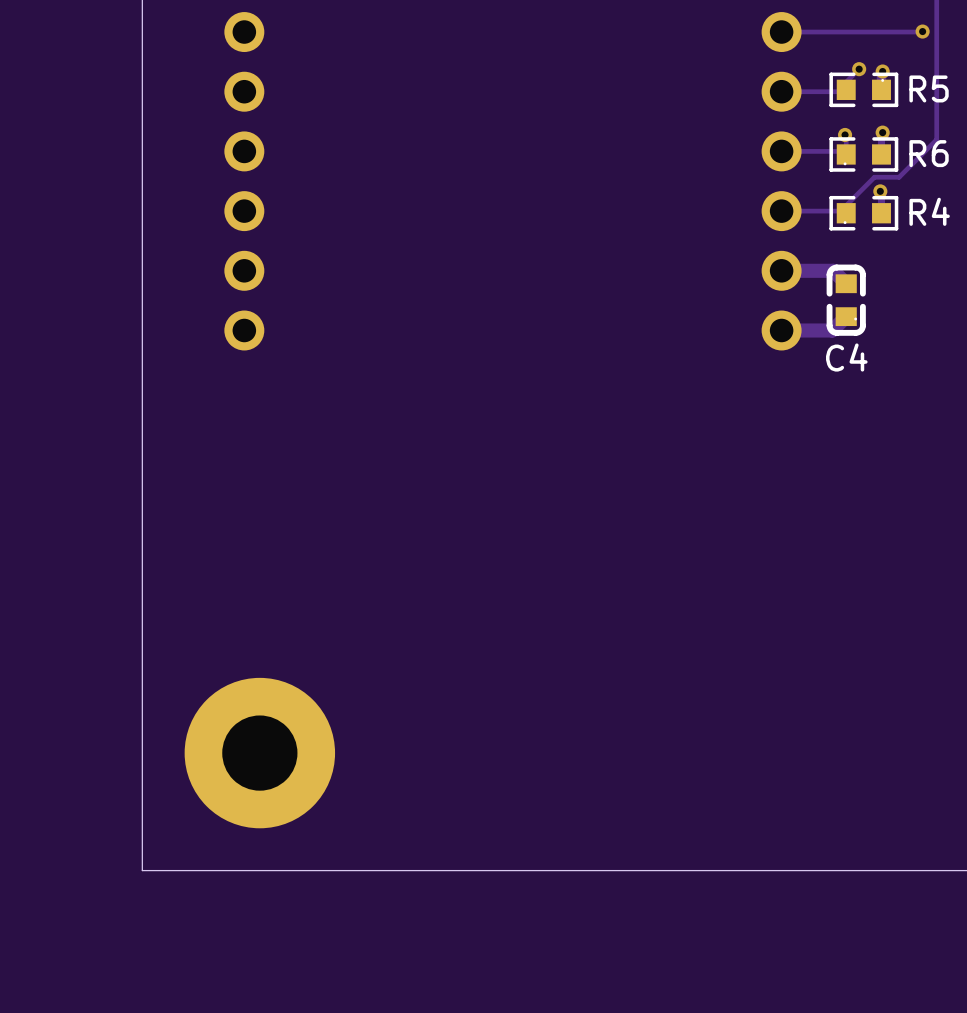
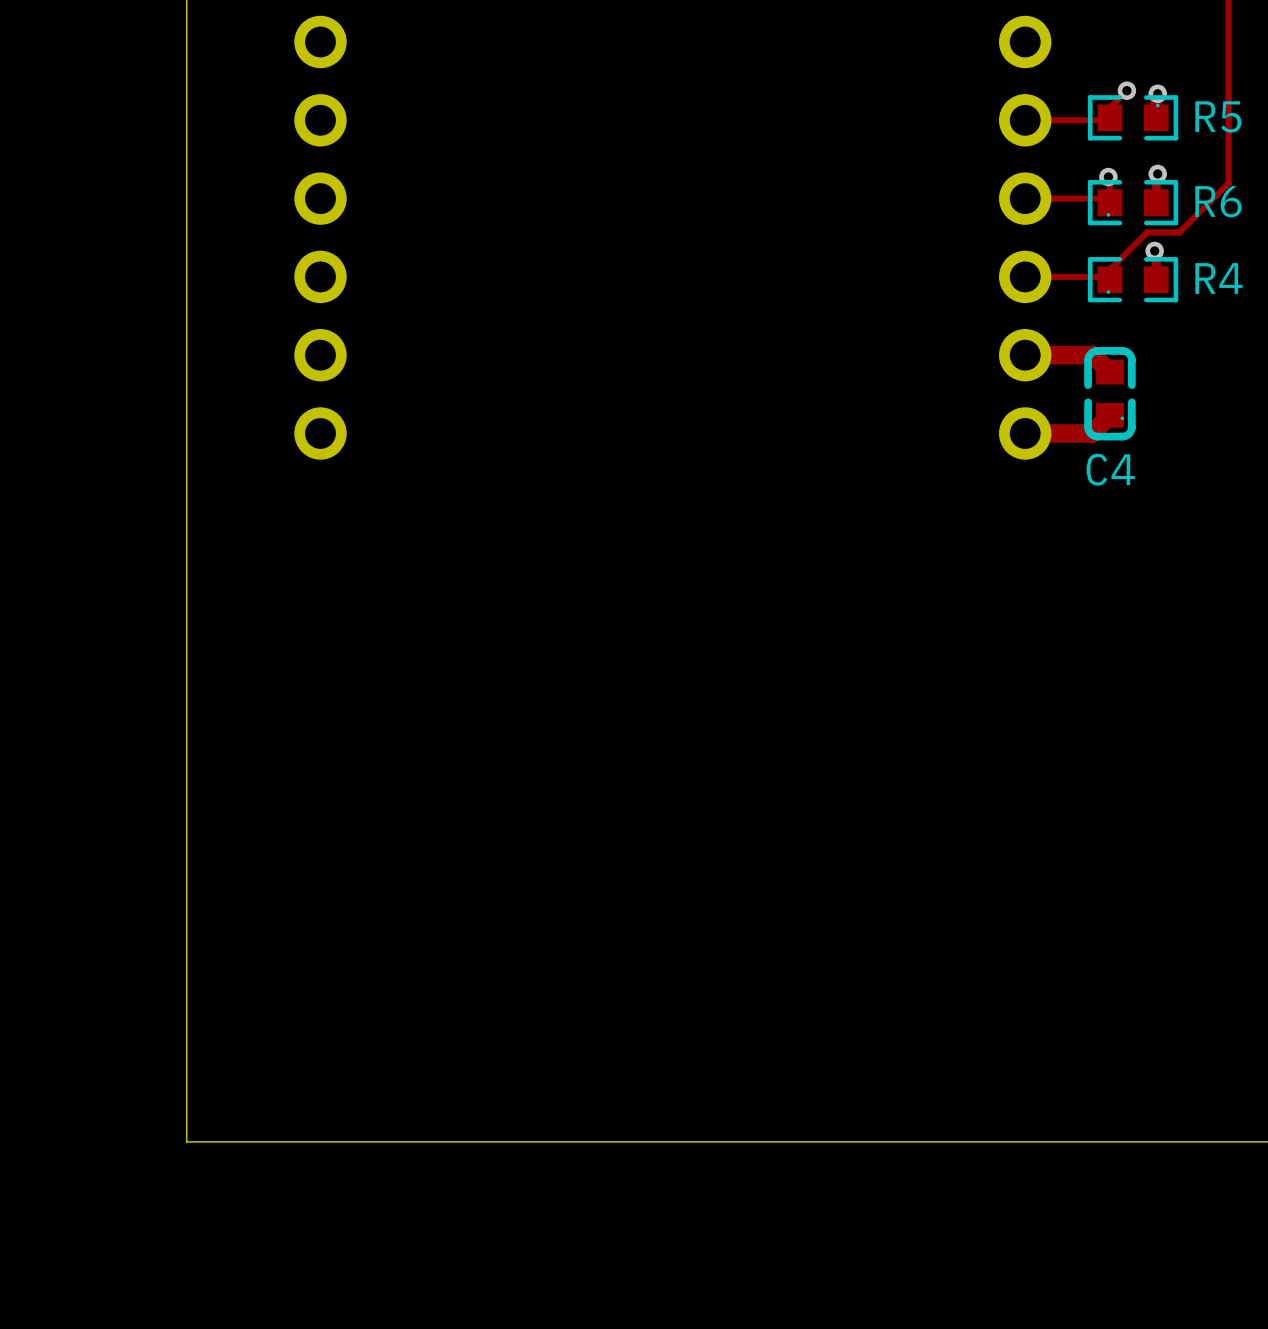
track: (922, 31) (781, 32) -> none
via: (922, 31) -> none
part: (259, 753) -> none

